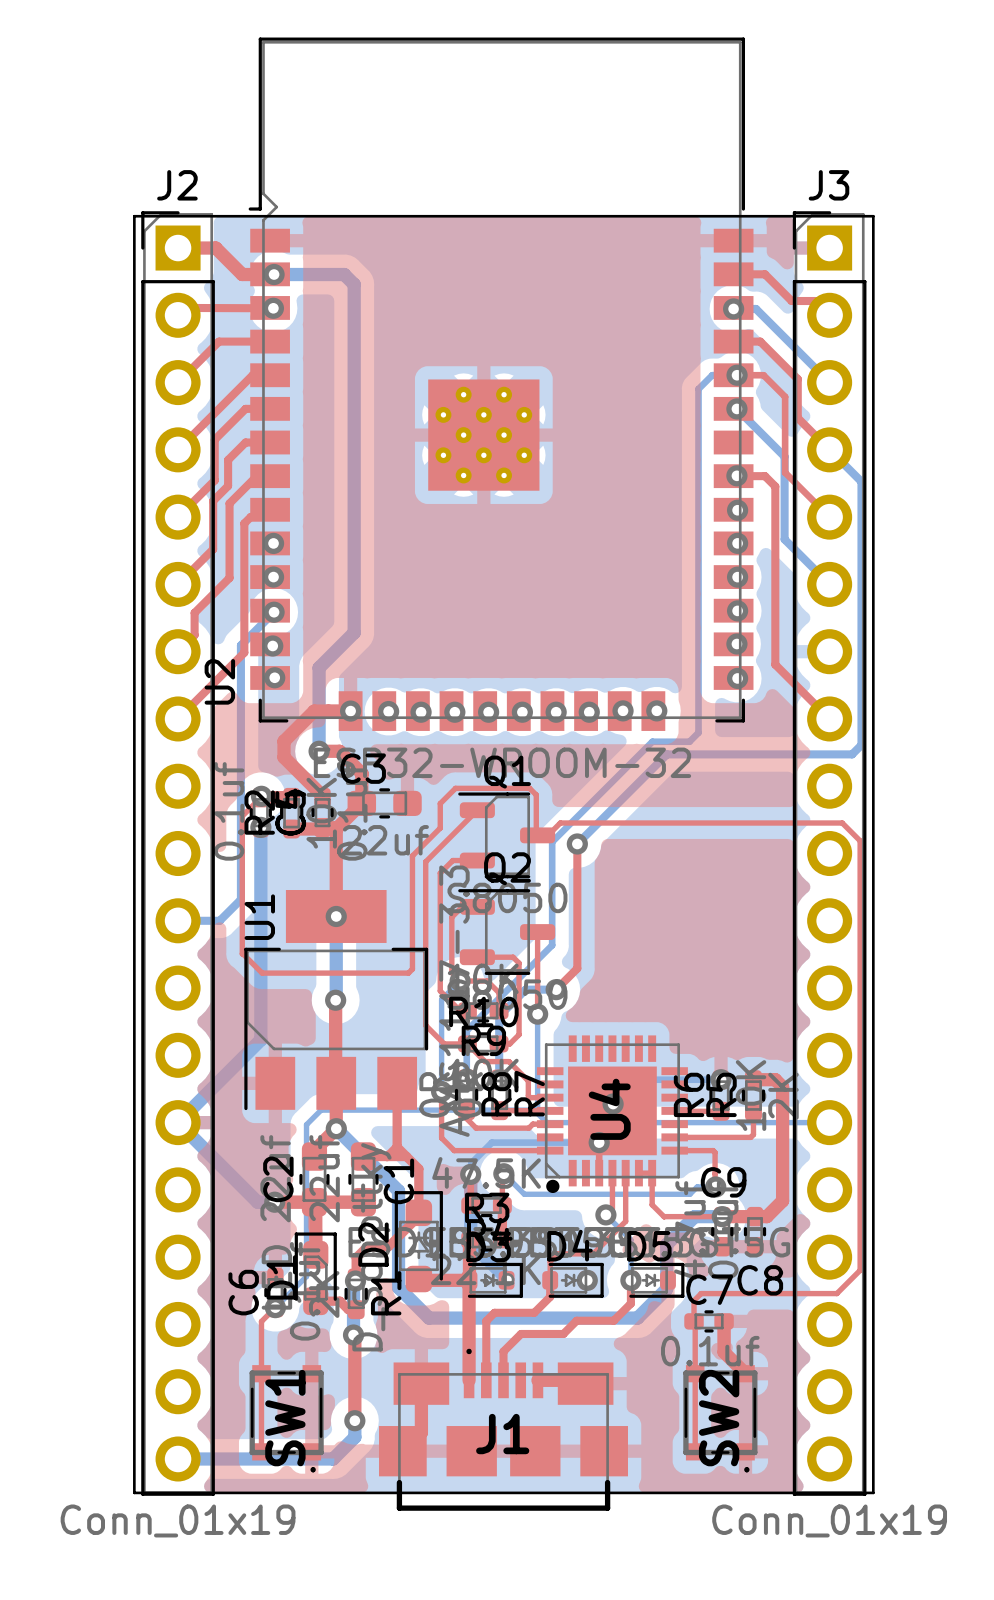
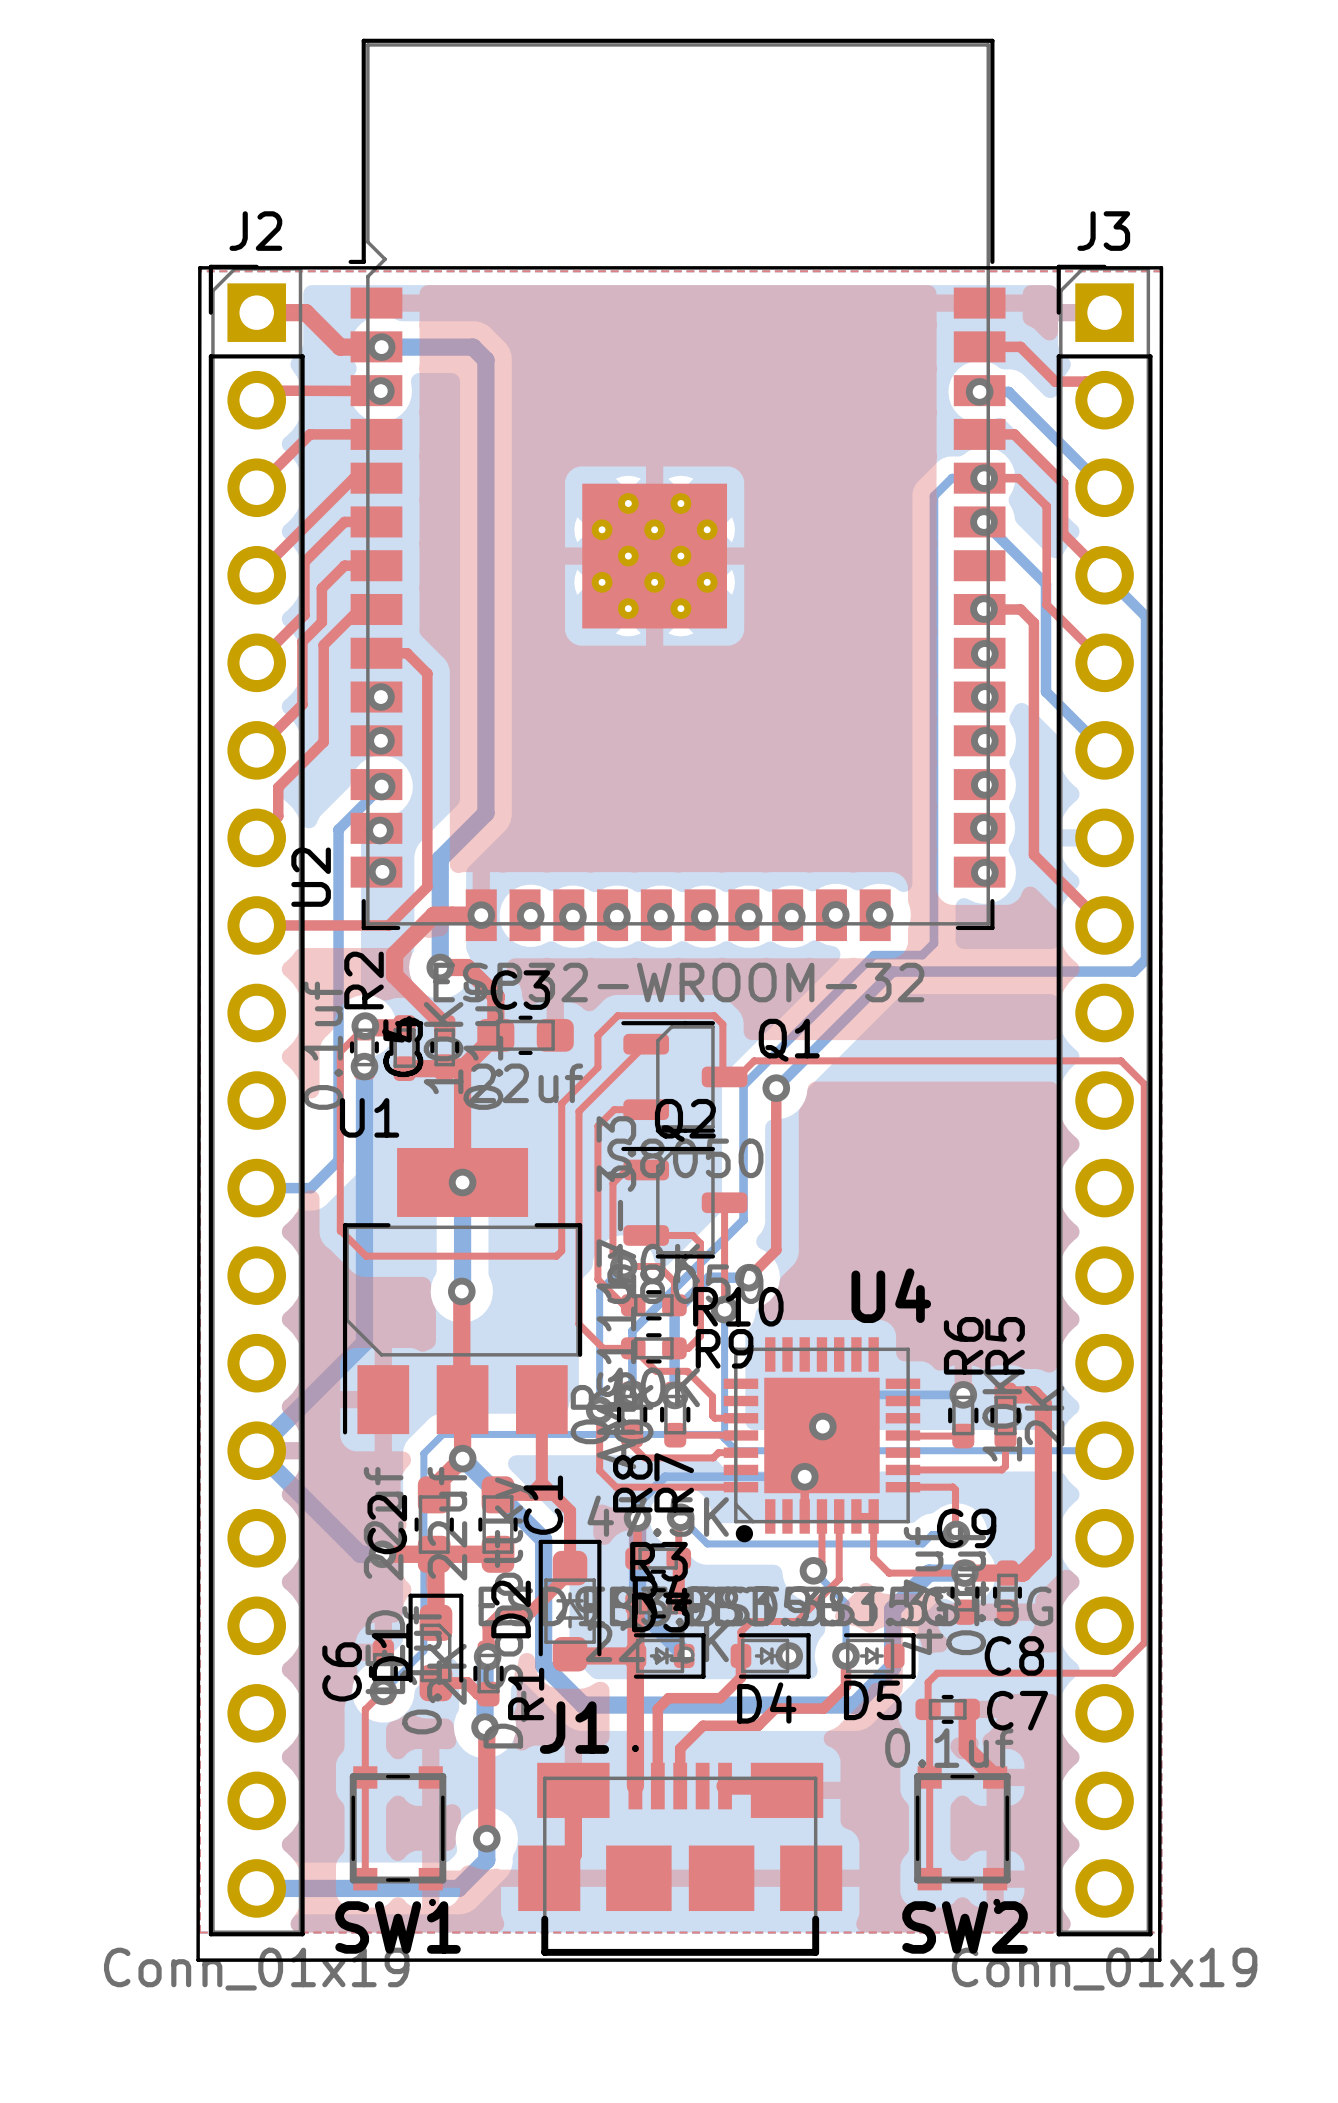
board edge: (134, 216) (134, 1492) (873, 1492) (873, 216) (134, 216) -> (199, 267) (198, 1960) (1159, 1960) (1161, 267) (199, 267)
top track: (273, 509) (266, 516) (250, 516) (244, 523) (244, 652) (178, 718) -> (380, 653) (406, 653) (427, 673) (427, 886) (388, 925) (256, 925)
C3 name position: C3 (363, 768) -> C3 (520, 990)
Q1 name position: Q1 (507, 772) -> Q1 (789, 1040)
R2 name position: R2 (259, 812) -> R2 (364, 980)
U1 name rotation: 0° (259, 917) -> 90° clockwise (369, 1117)
R10 name position: R10 (483, 1011) -> R10 (738, 1306)
R9 name position: R9 (483, 1040) -> R9 (724, 1348)
R7 name position: R7 (529, 1093) -> R7 (674, 1482)
R8 name position: R8 (496, 1094) -> R8 (632, 1483)
R6 name position: R6 (689, 1094) -> R6 (963, 1345)
R5 name position: R5 (721, 1094) -> R5 (1005, 1345)
U4 name rotation: 0° (609, 1109) -> 90° clockwise (891, 1295)
U4 name position: U4 (609, 1109) -> U4 (891, 1295)
C1 name position: C1 (398, 1181) -> C1 (543, 1505)
D4 name position: D4 (569, 1245) -> D4 (766, 1702)
D5 name position: D5 (649, 1246) -> D5 (872, 1700)
C7 name position: C7 (709, 1289) -> C7 (1017, 1710)
R1 name position: R1 (386, 1293) -> R1 (526, 1694)
SW1 name rotation: 0° (285, 1418) -> 90° clockwise (398, 1927)
SW2 name rotation: 0° (719, 1418) -> 90° clockwise (964, 1927)
J1 name position: J1 (502, 1434) -> J1 (574, 1727)

